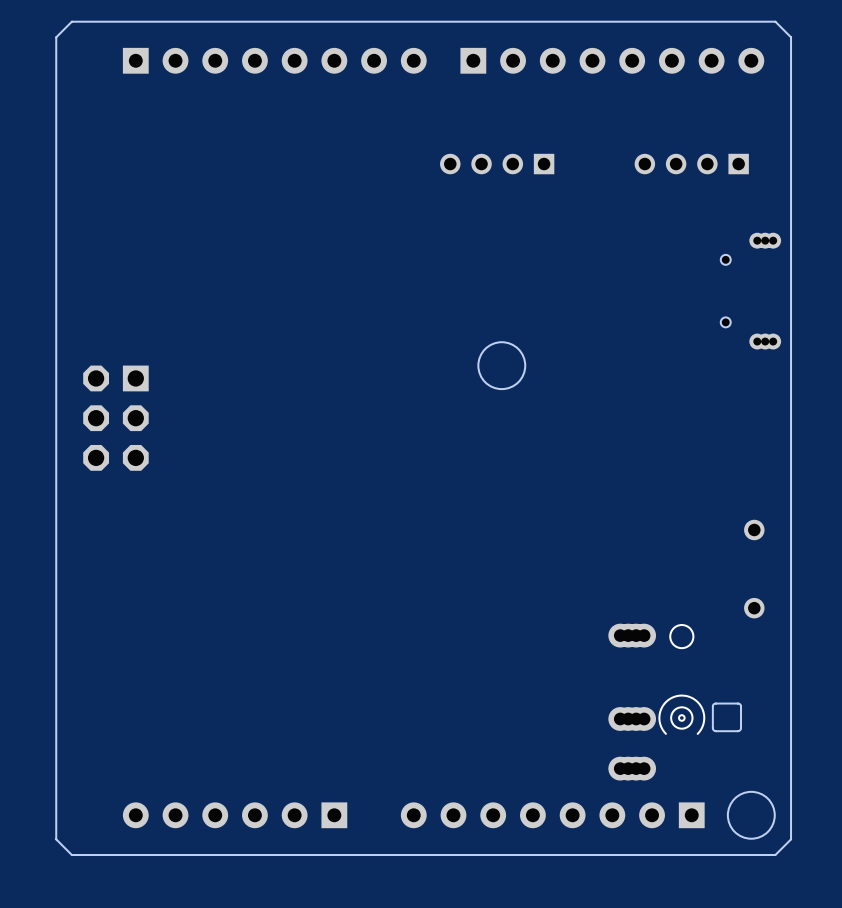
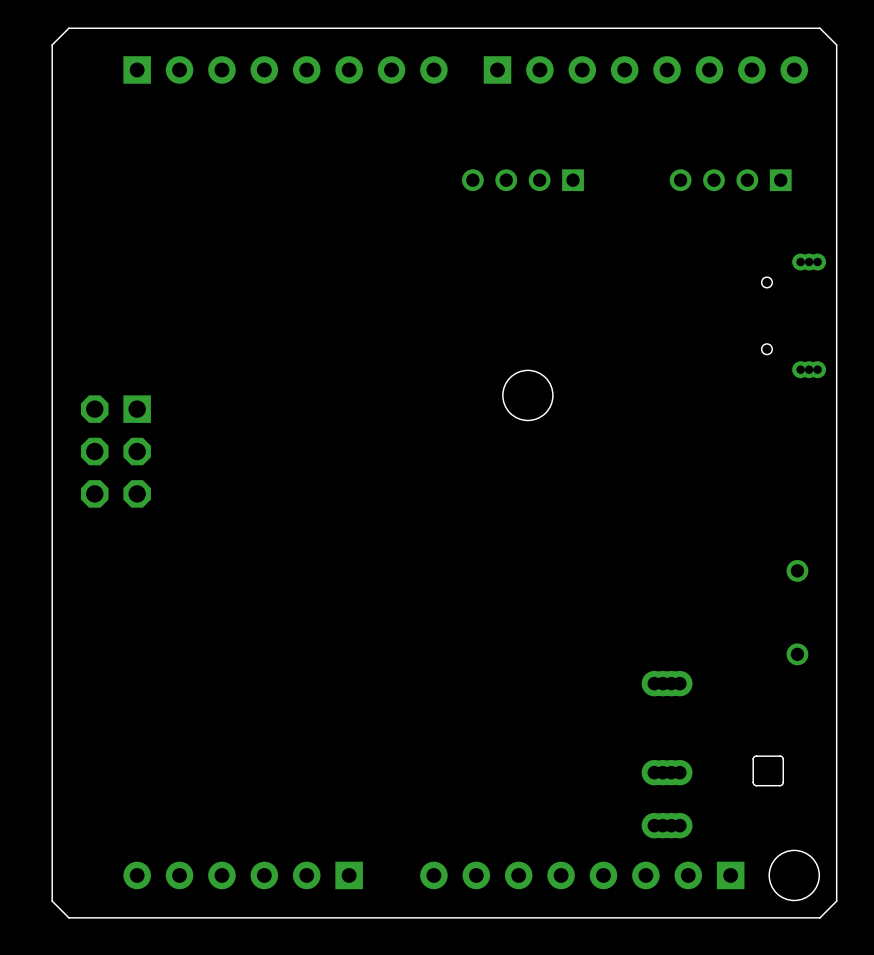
drawing: [669, 624, 695, 650] -> none
drawing: [670, 706, 694, 730] -> none
line: (697, 733) (703, 723) (702, 709) (695, 700) (681, 695) (668, 700) (661, 709) (660, 723) (665, 733) -> none

